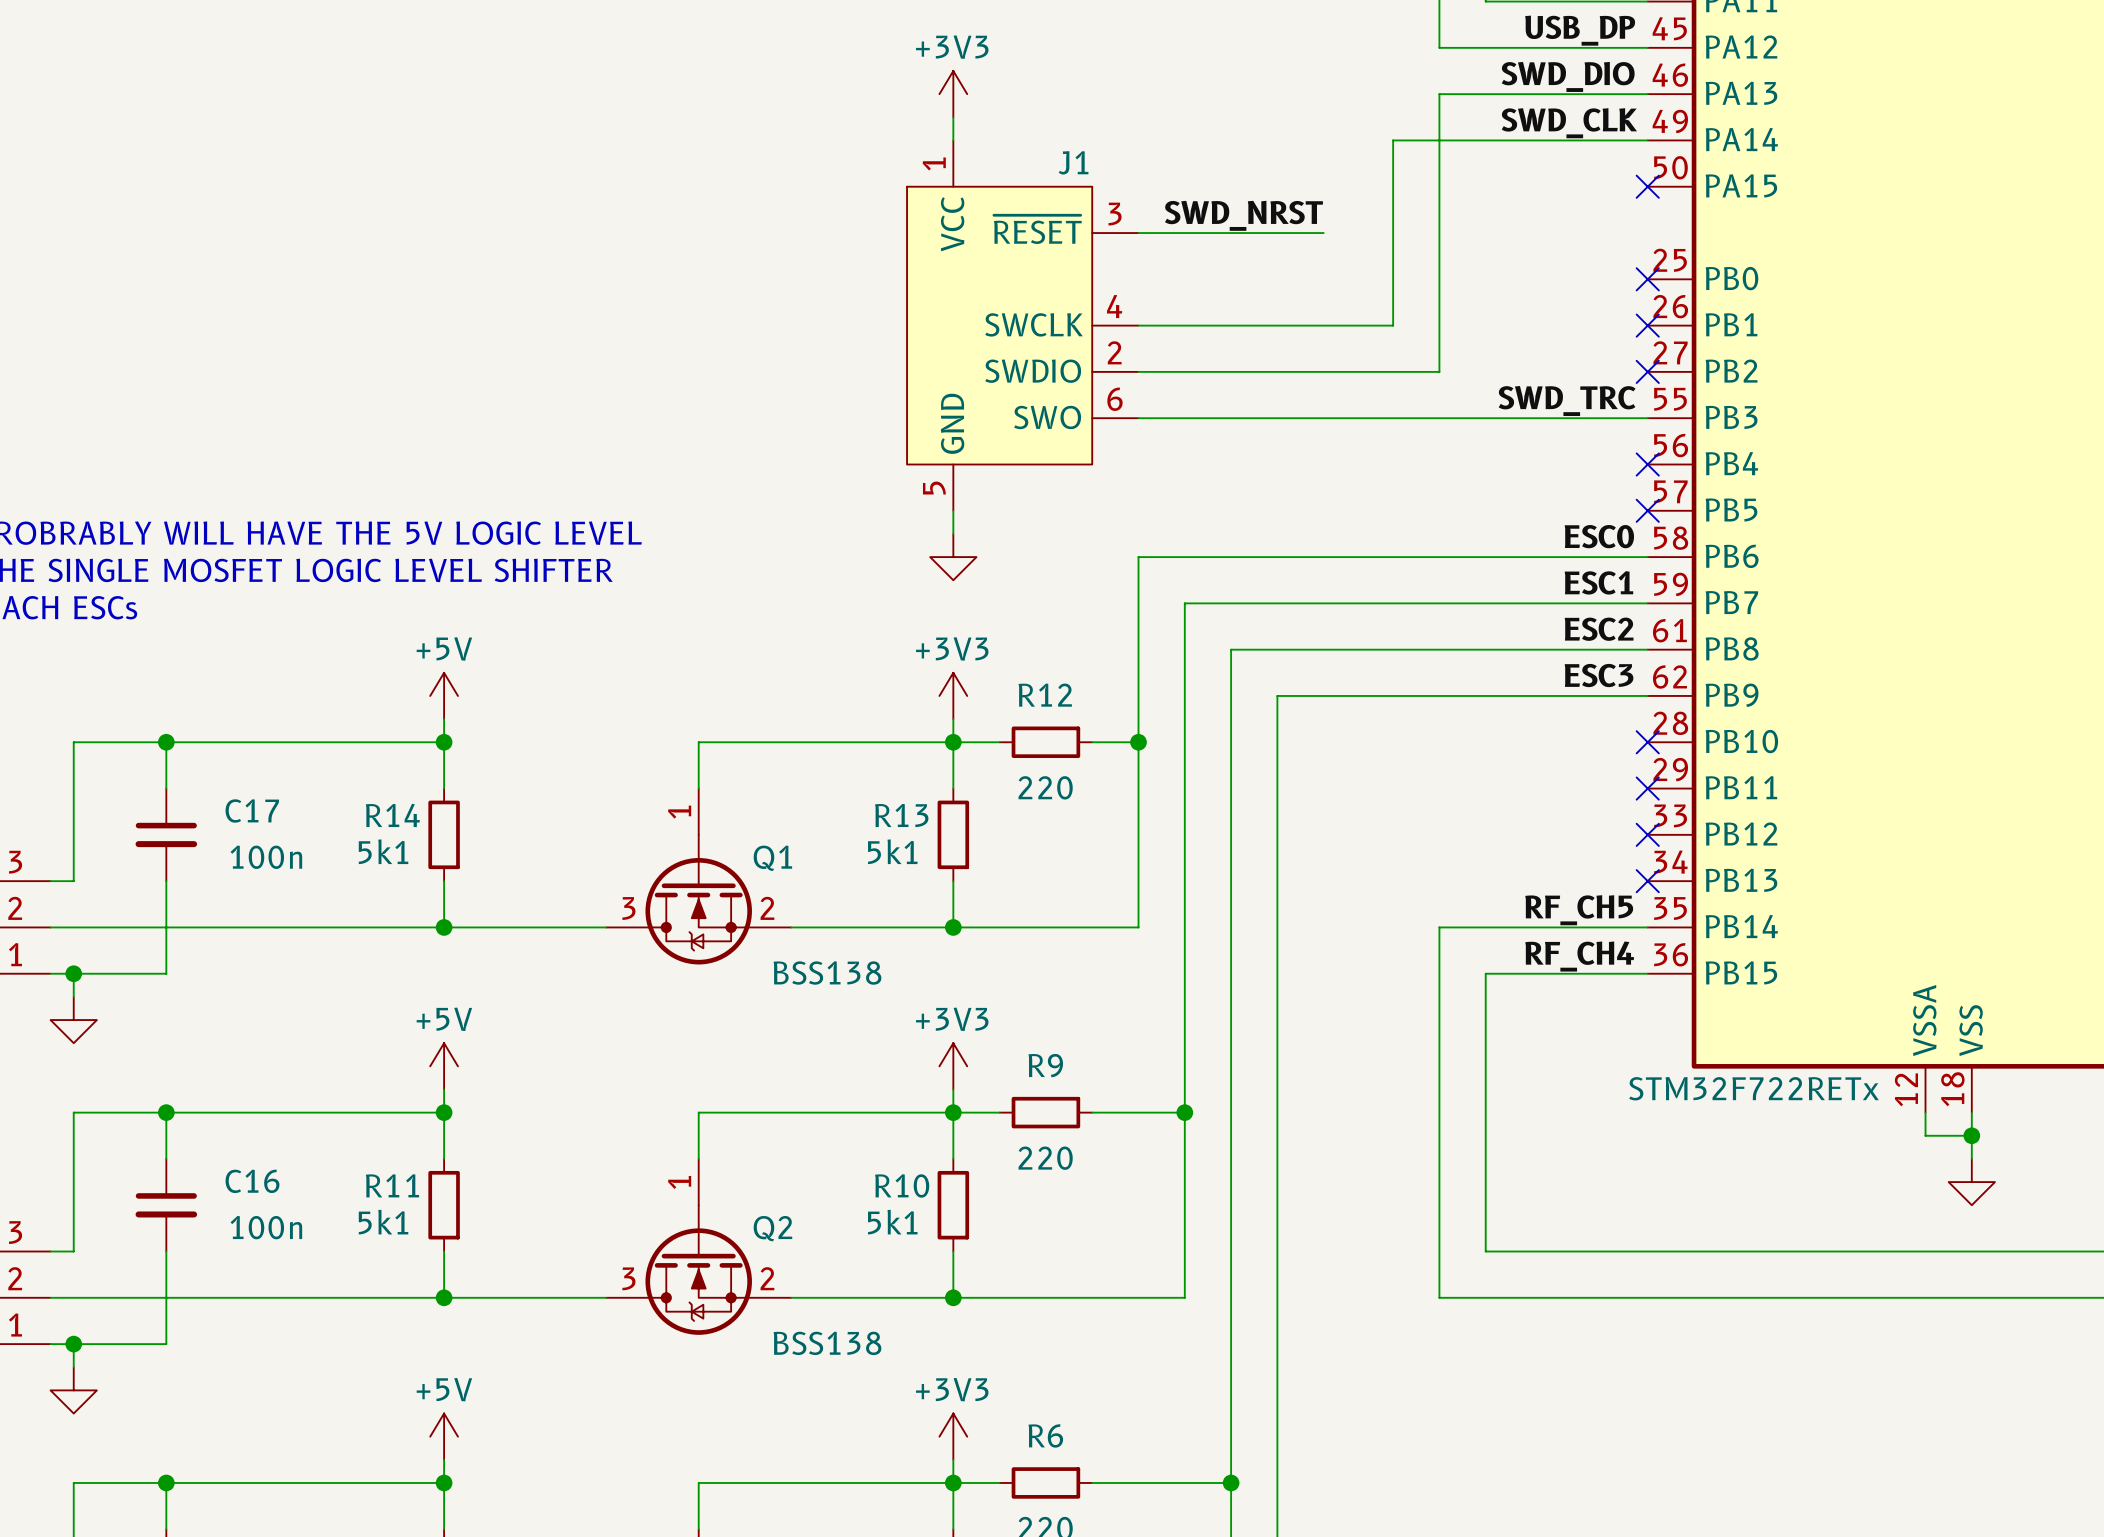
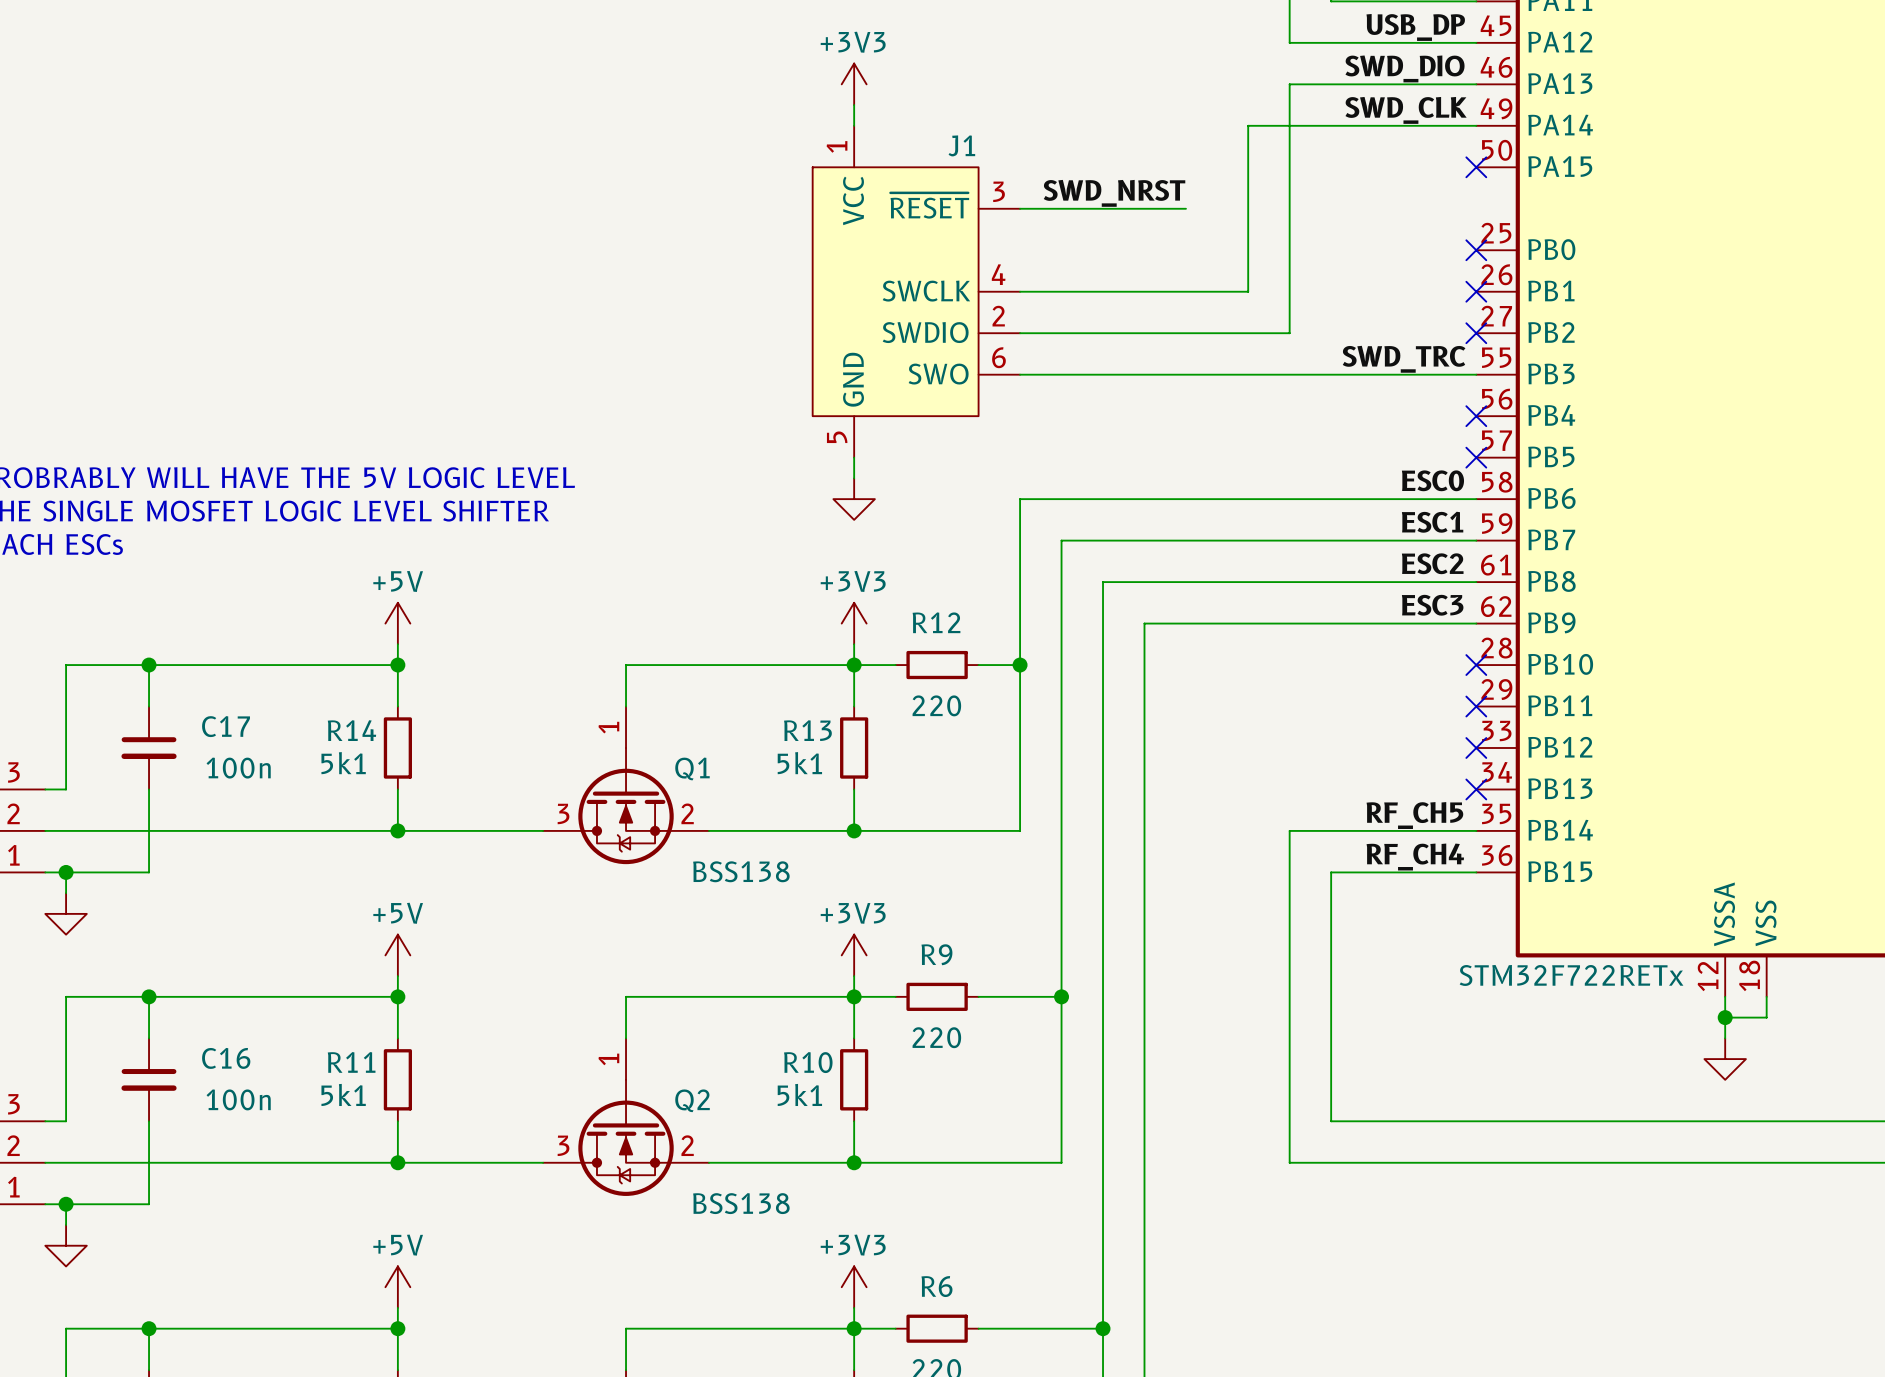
wire: (1971, 1135) (1971, 1158) -> (1725, 1017) (1725, 1038)
junction position: (1971, 1135) -> (1725, 1017)
power symbol position: (1971, 1182) -> (1725, 1059)

